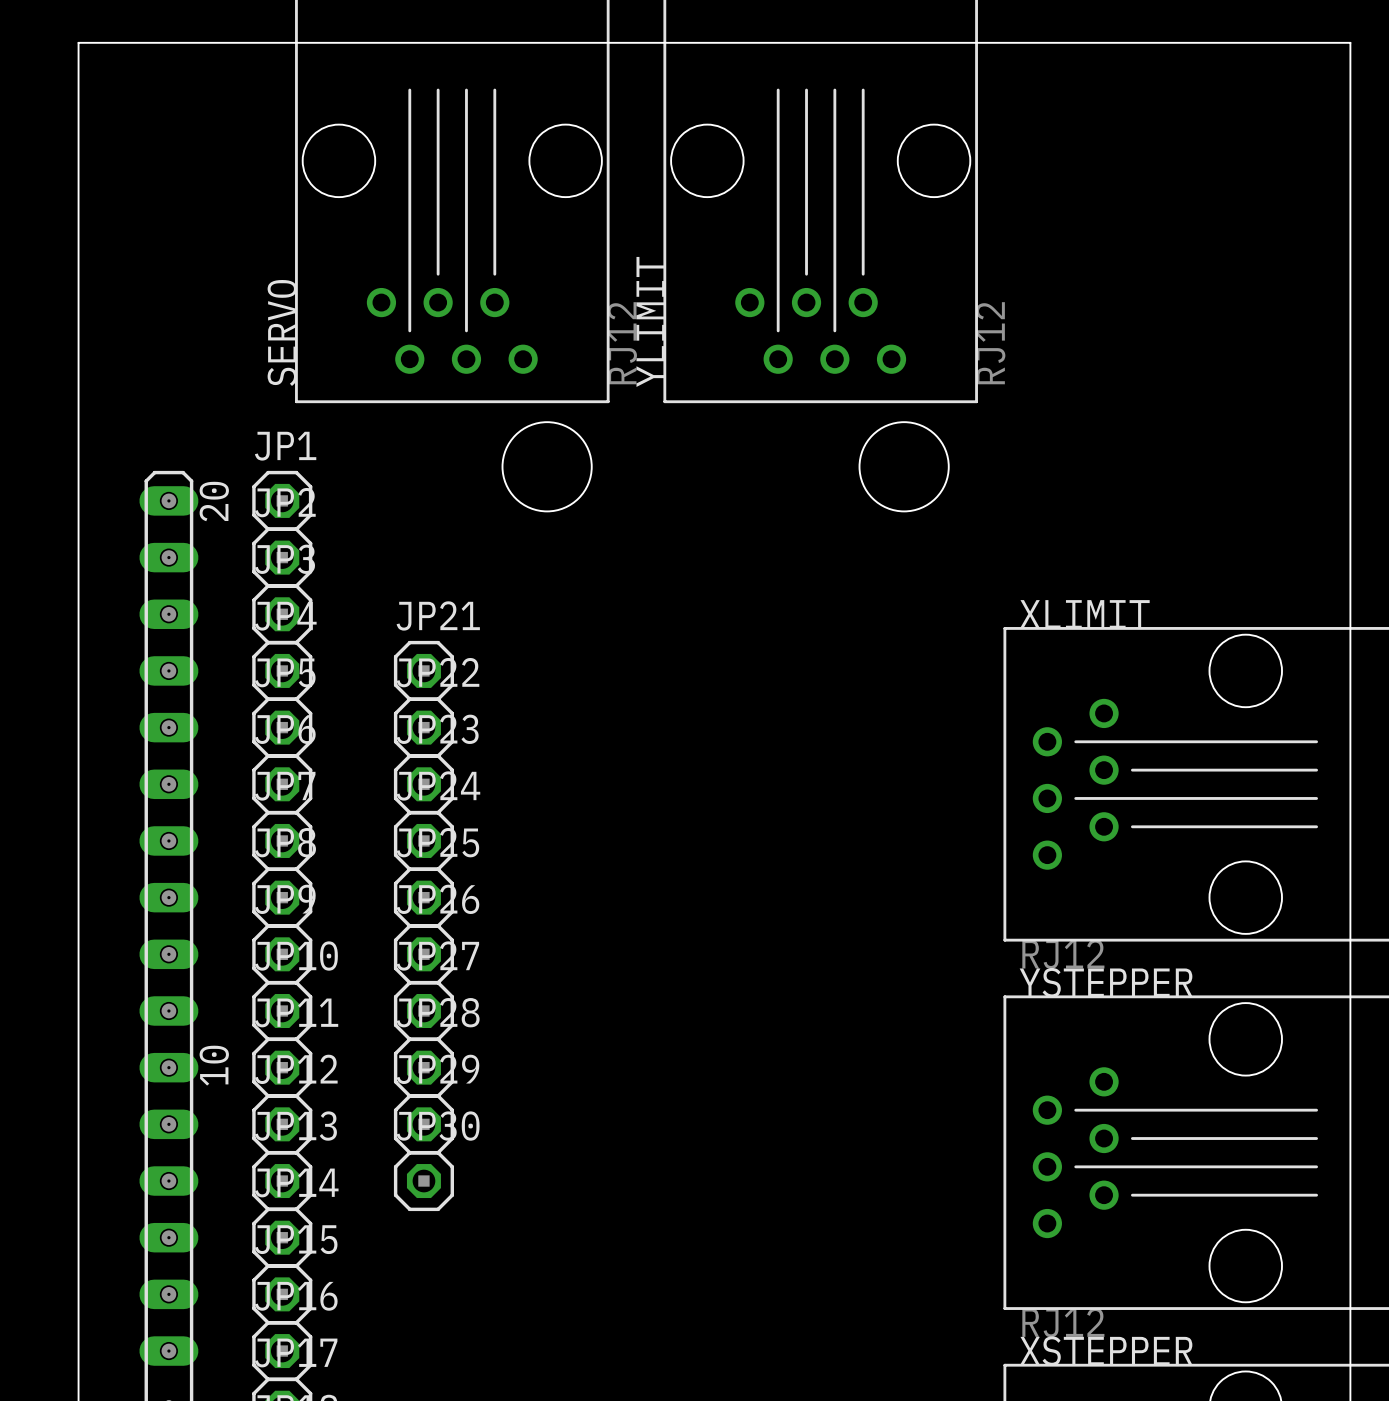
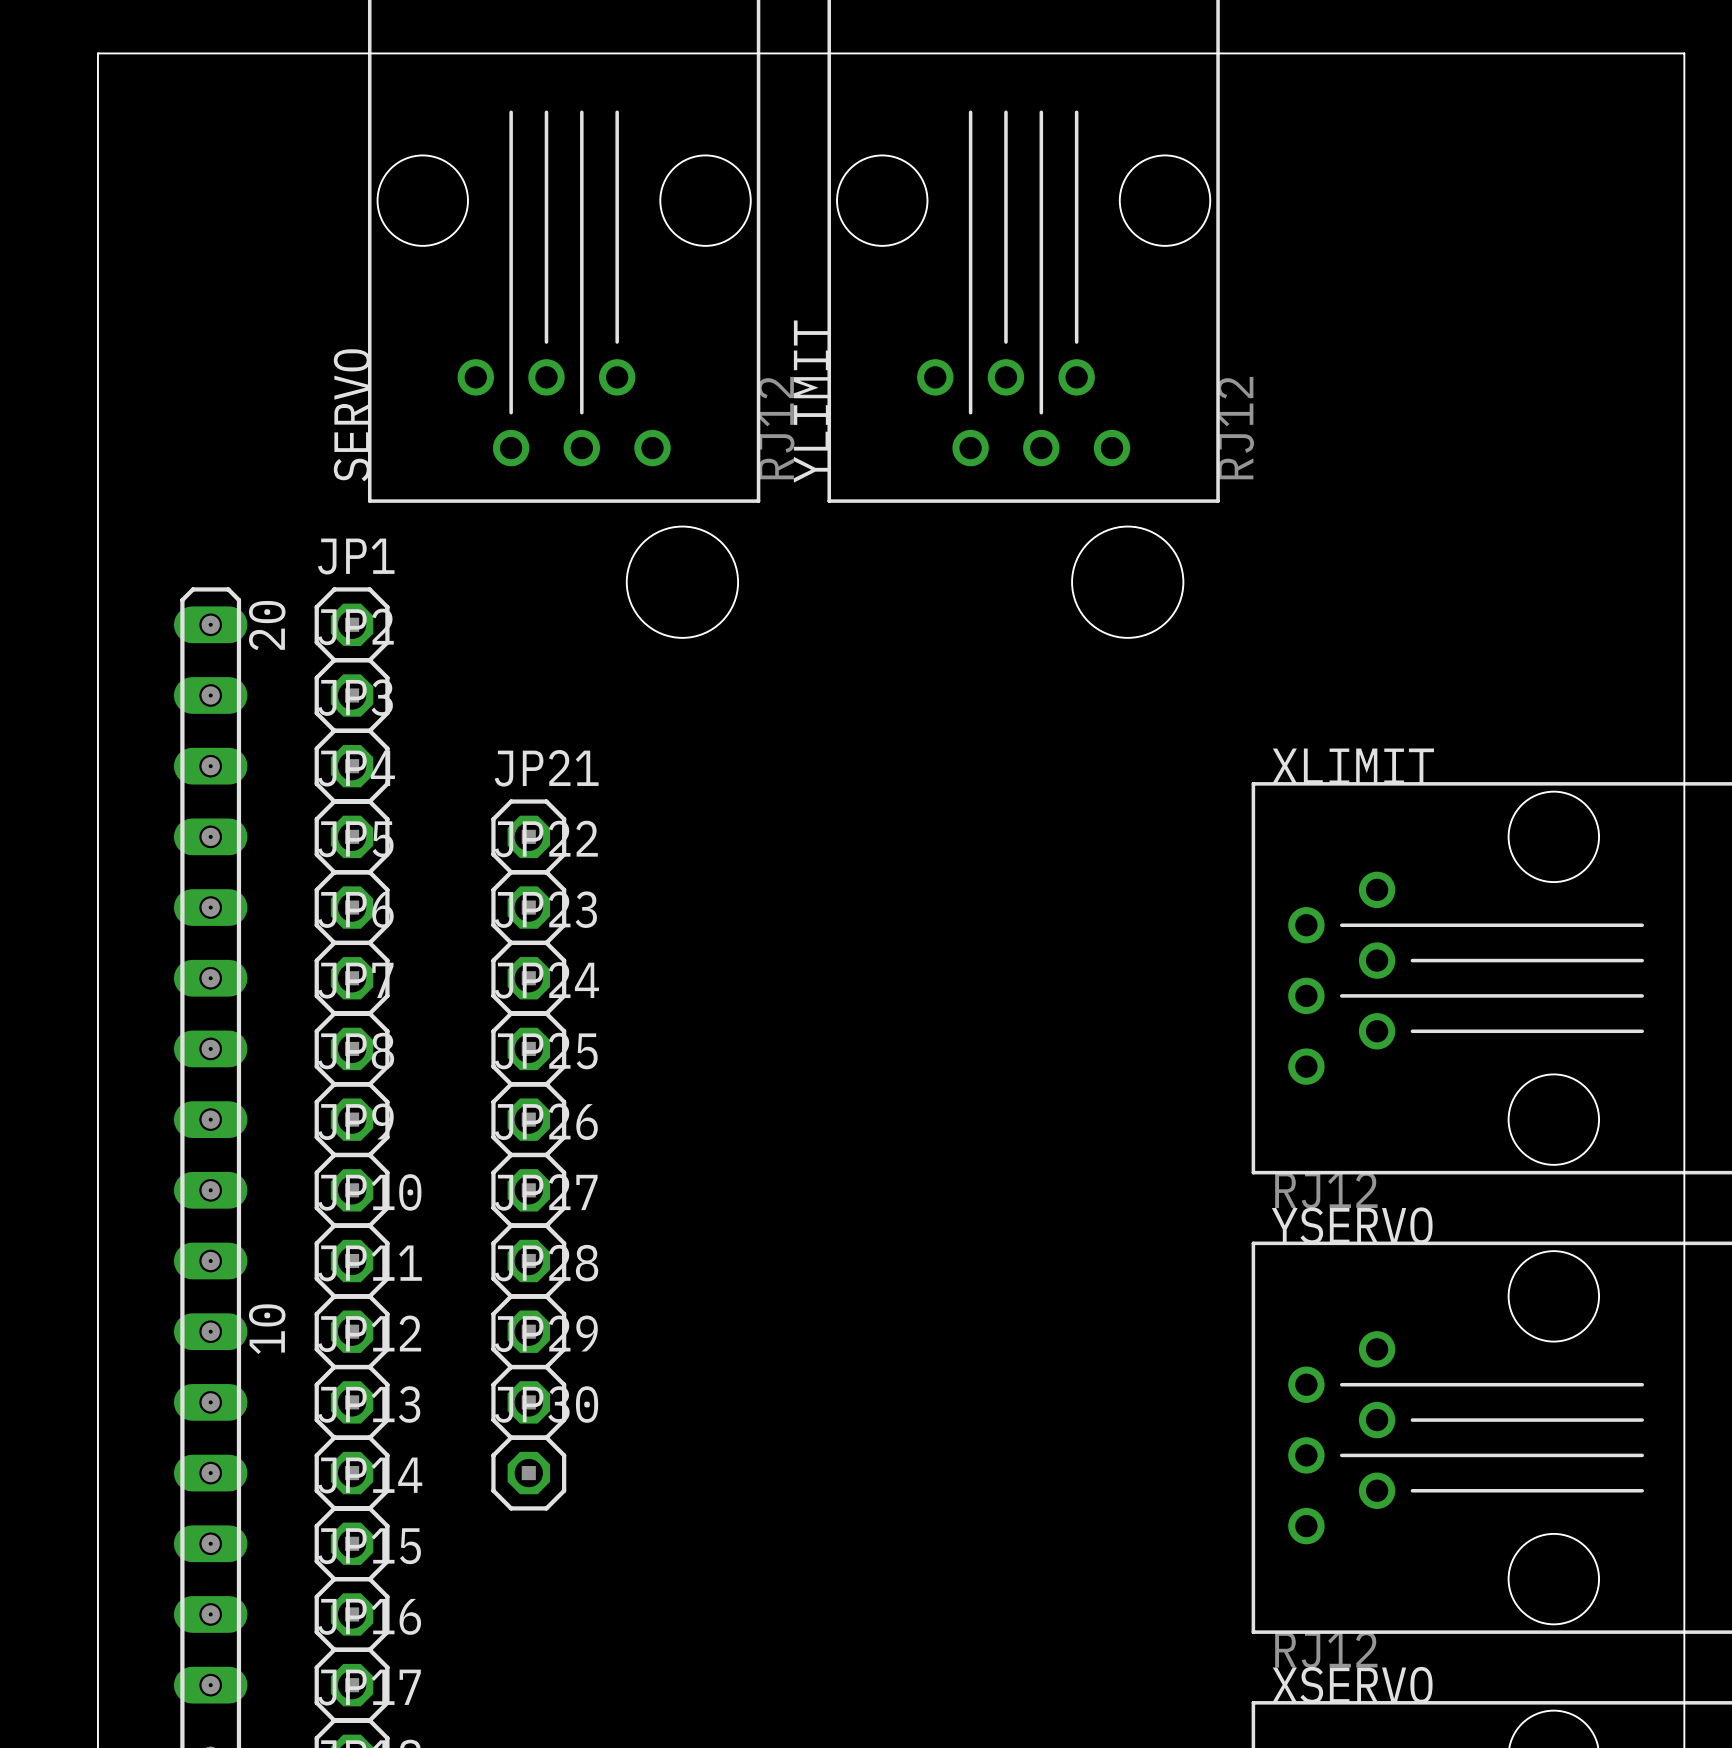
YSTEPPER name: YSTEPPER (1106, 982) -> YSERVO (1352, 1225)
XSTEPPER name: XSTEPPER (1106, 1351) -> XSERVO (1352, 1685)

